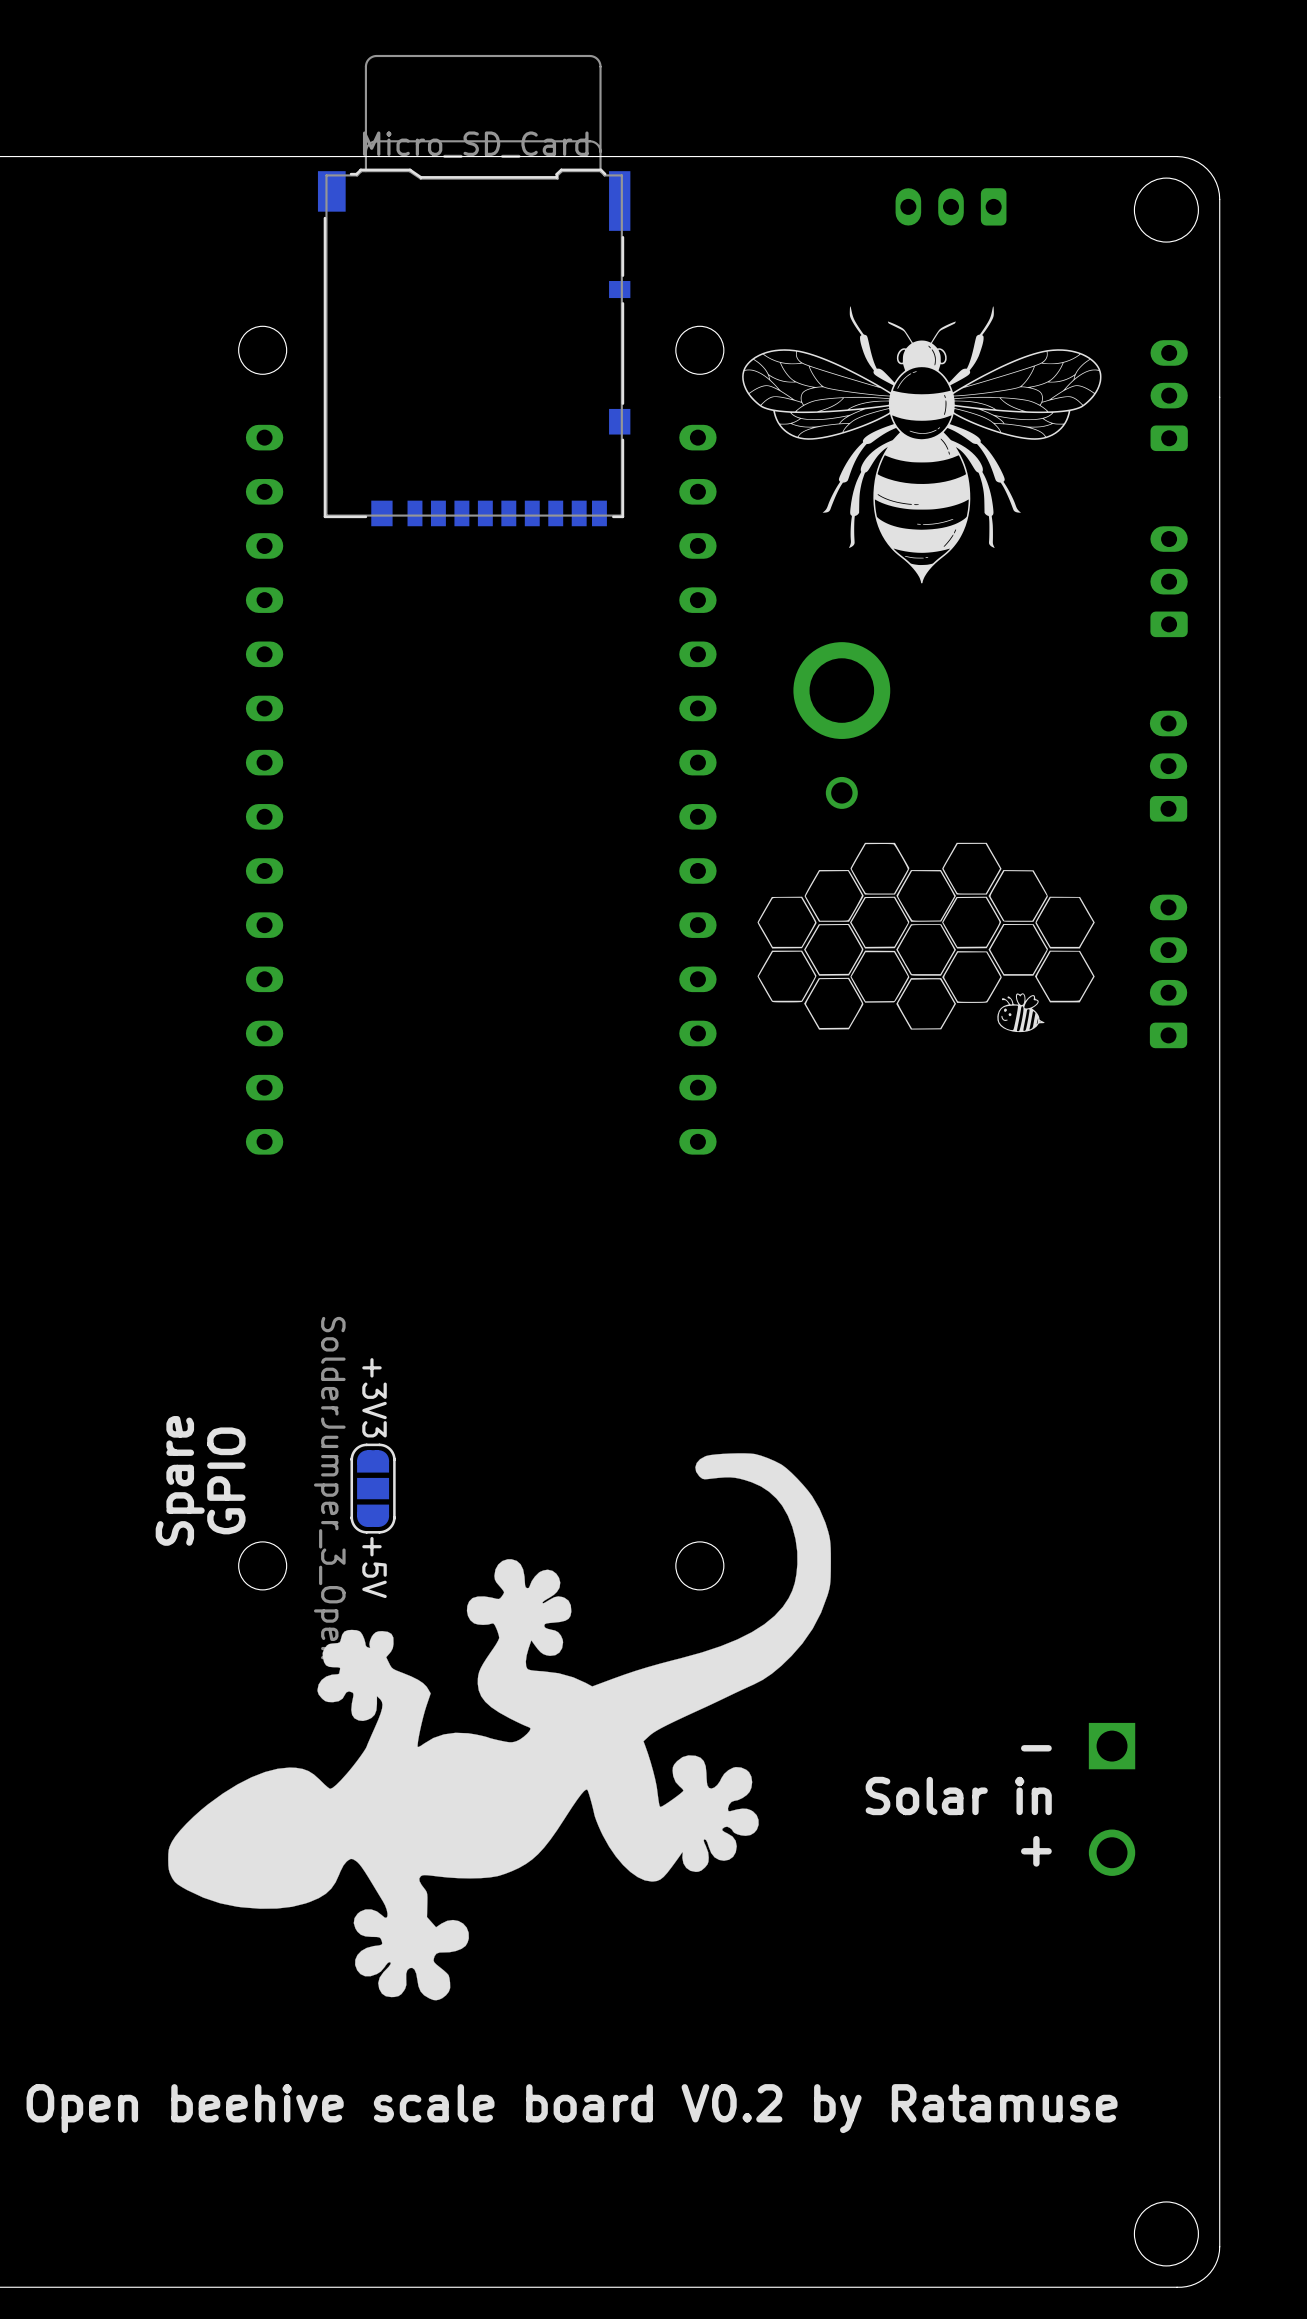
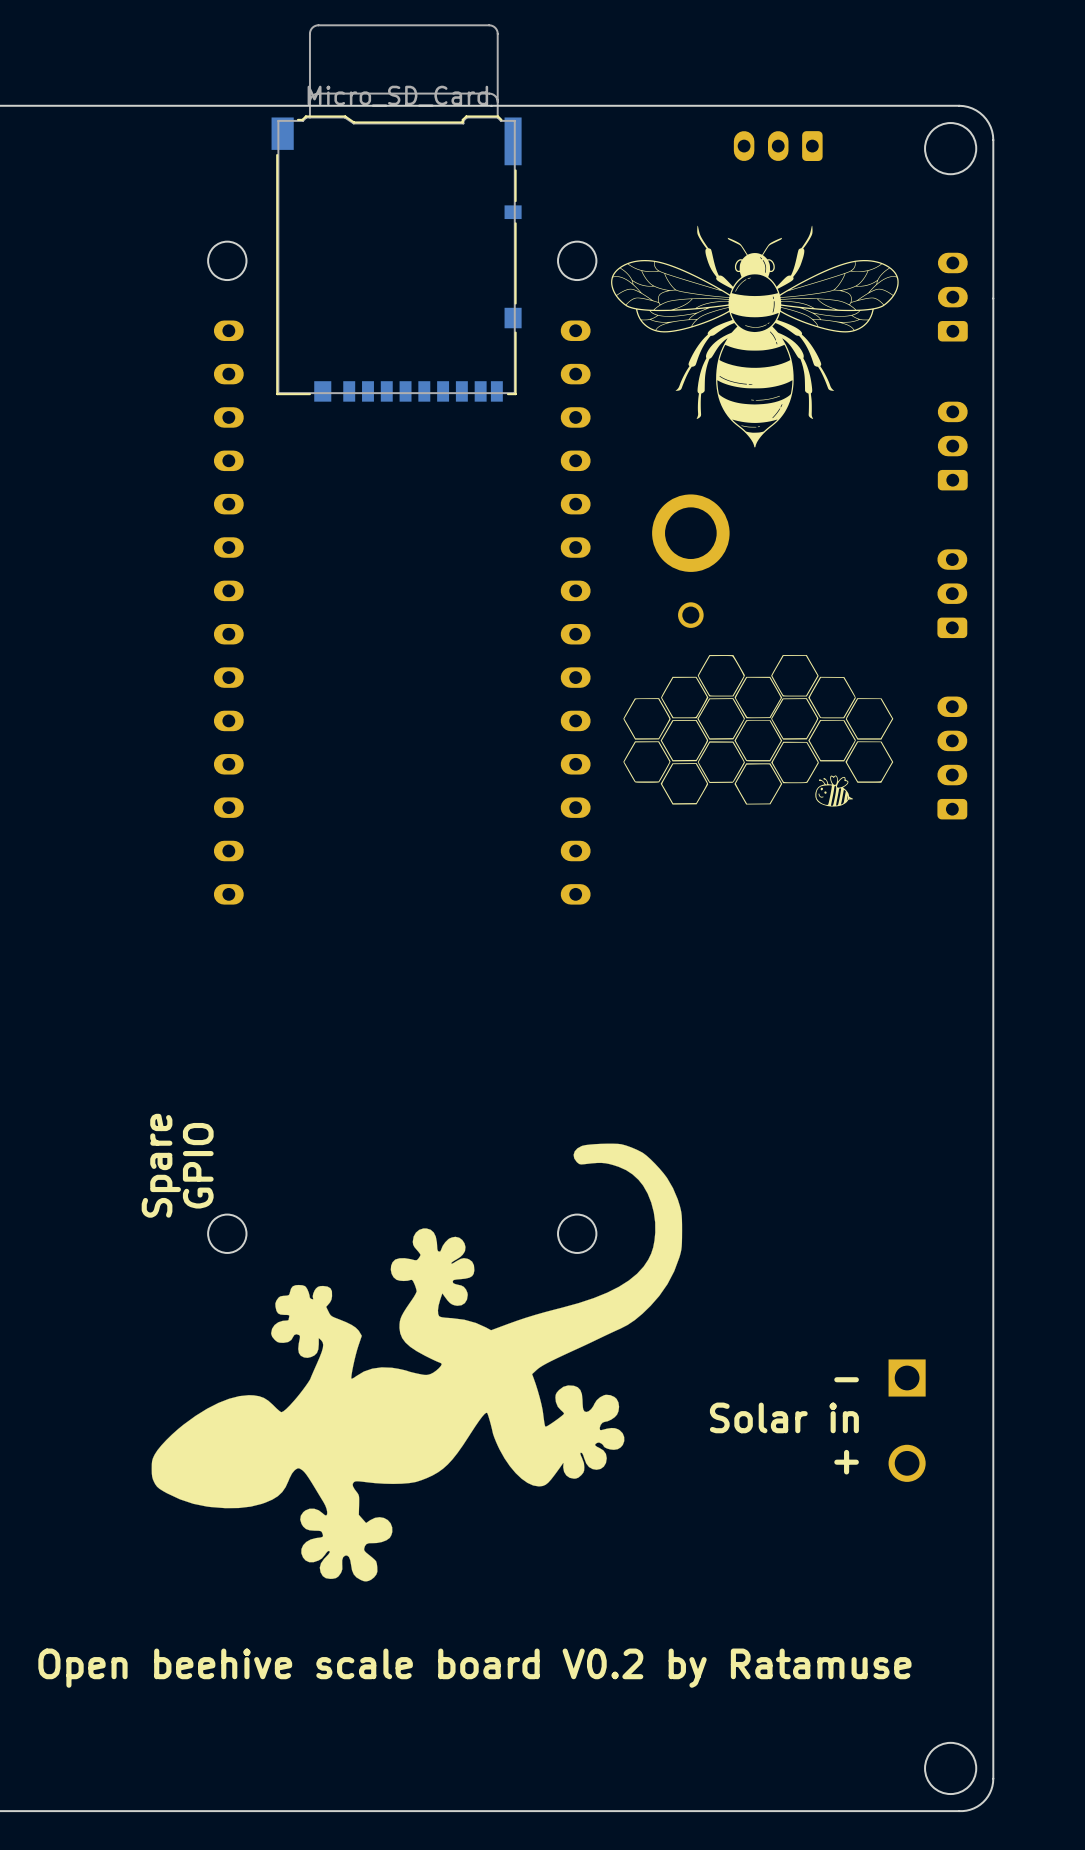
part: SolderJumper_3_Open (373, 1488) -> none

